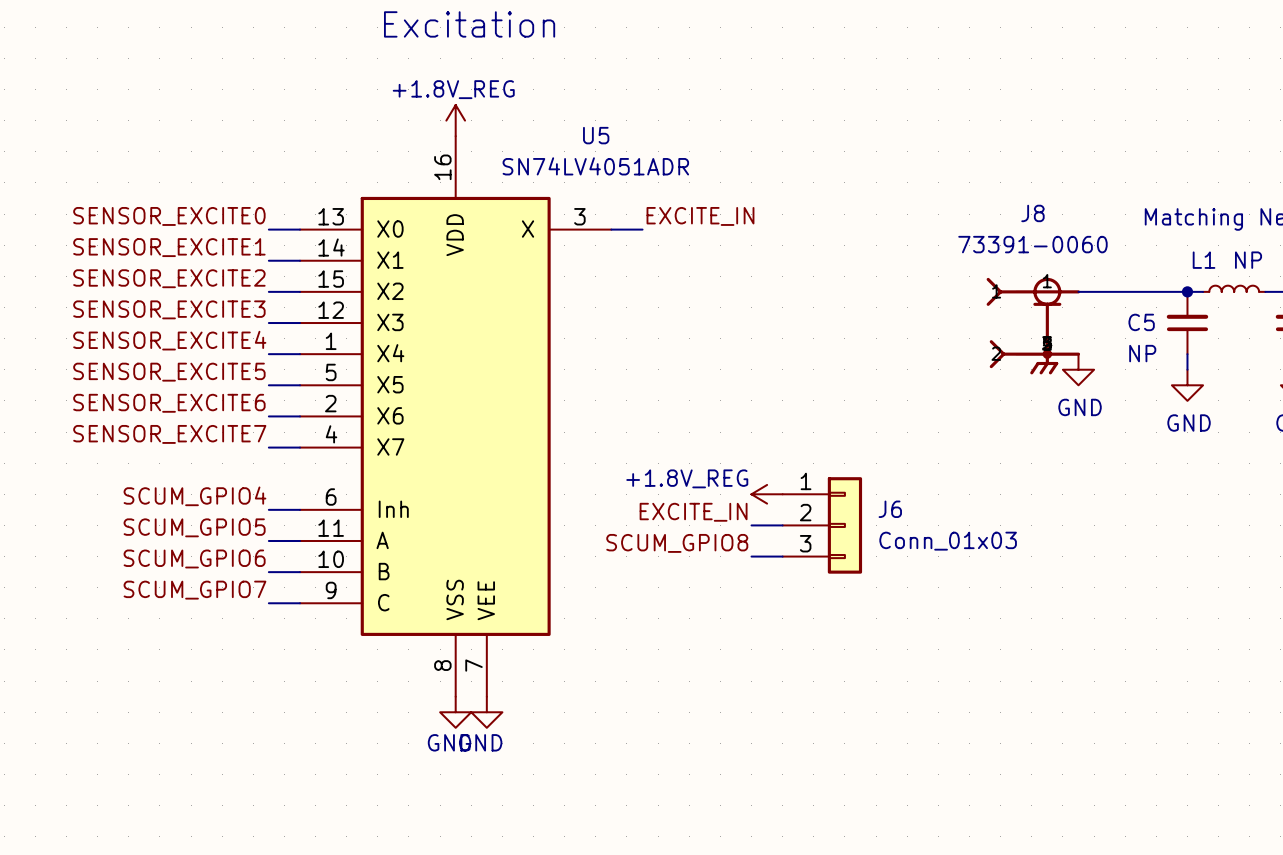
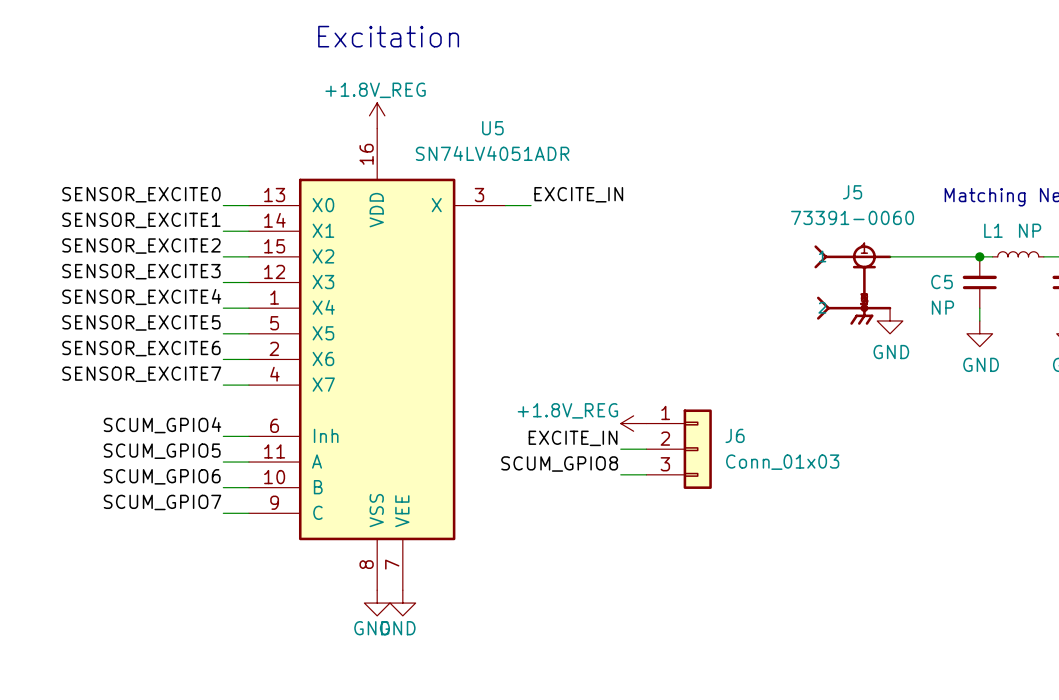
J8 name: J8 (1032, 213) -> J5 (852, 192)

